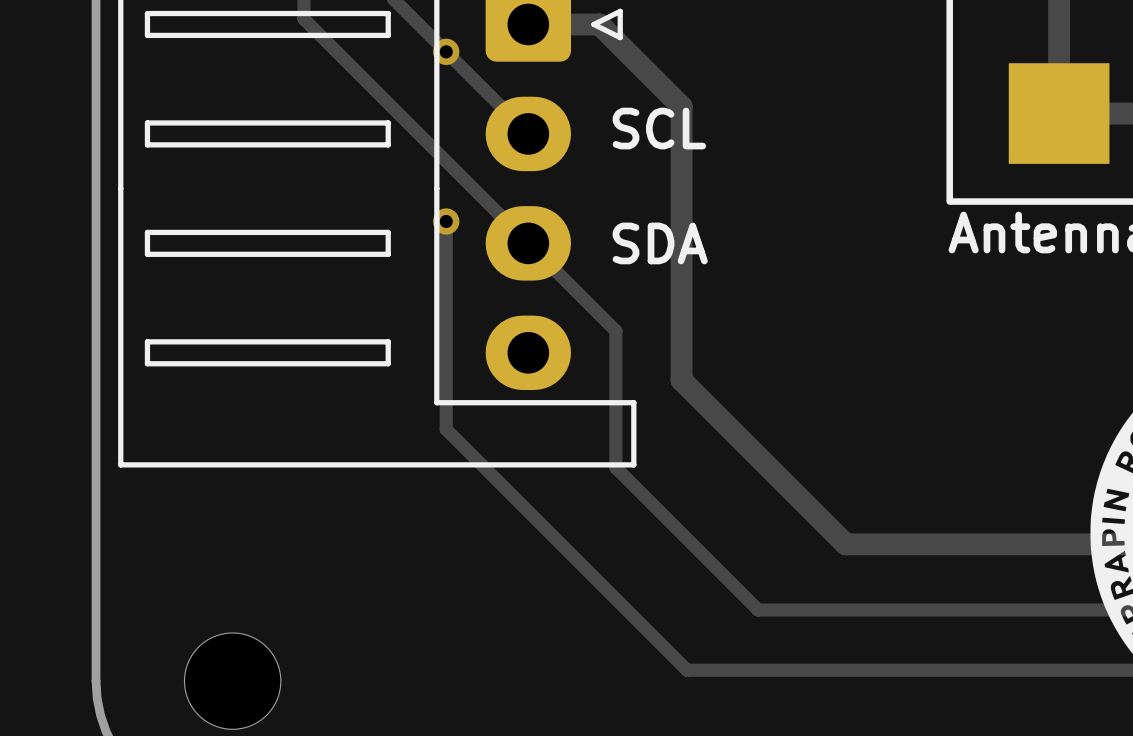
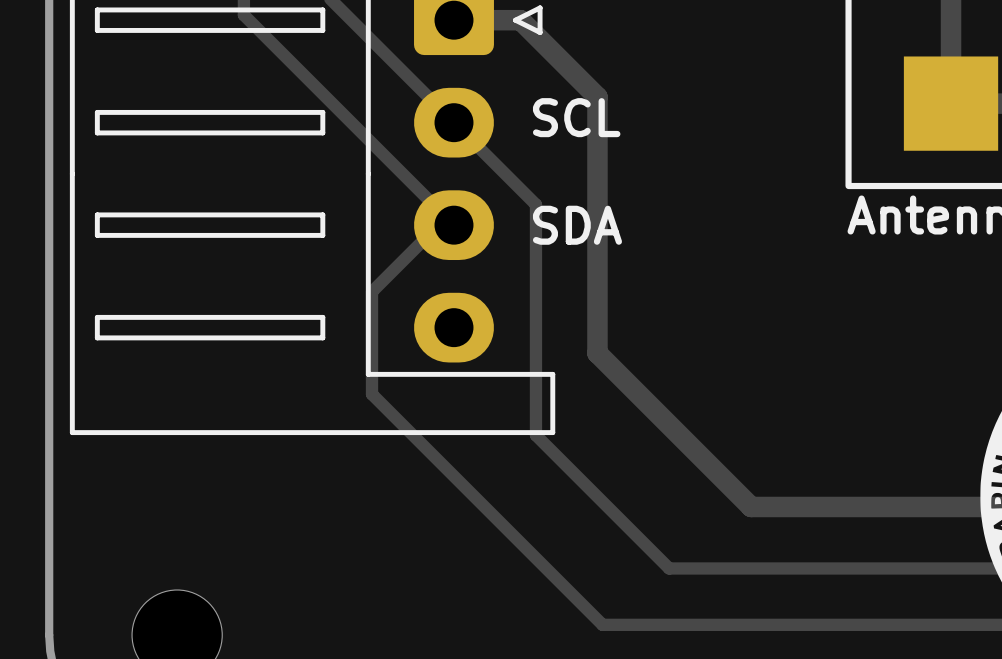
via: (446, 51) -> none
track: (446, 221) (446, 429) -> (438, 225) (372, 291) (372, 394) (377, 399)
via: (446, 221) -> none
track: (528, 243) (615, 330) -> (453, 122) (535, 204) (535, 307)

